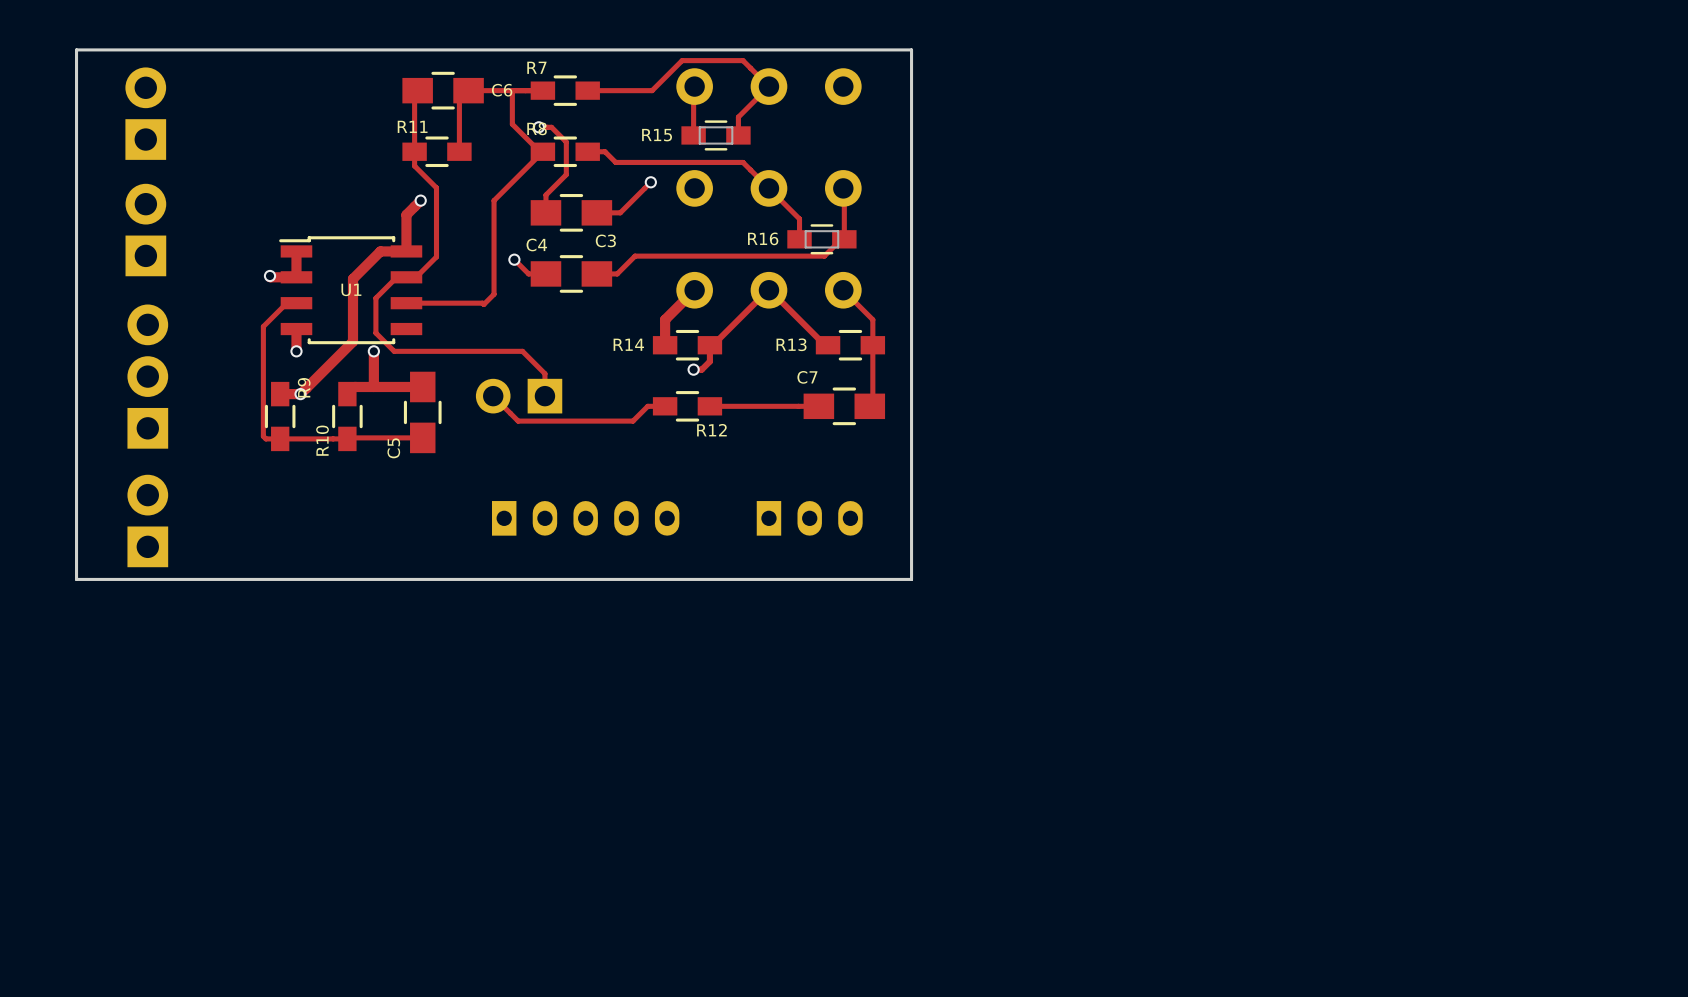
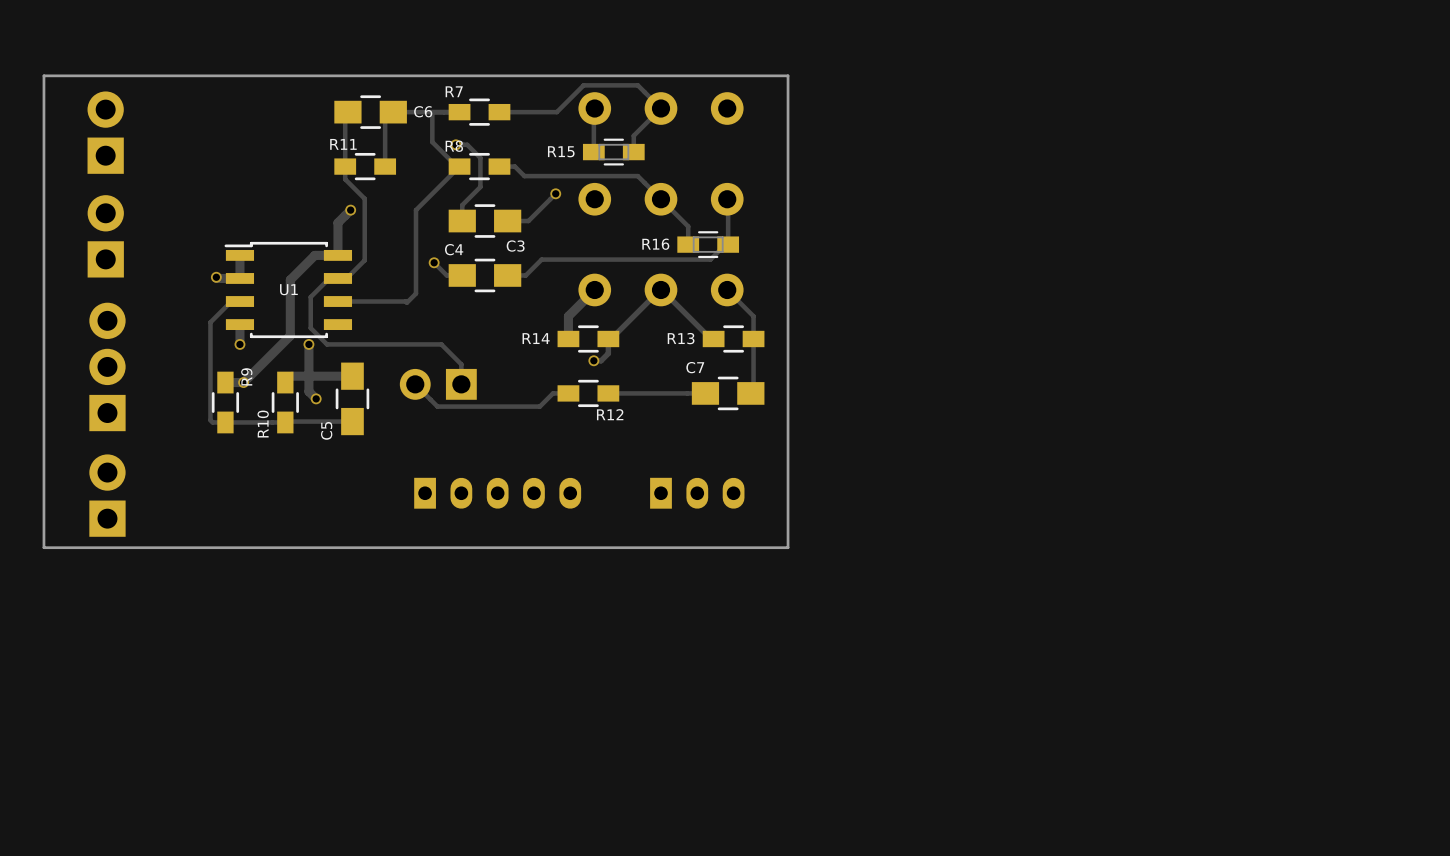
track: none -> (308, 376) (308, 391) (316, 398)
via: none -> (316, 398)

